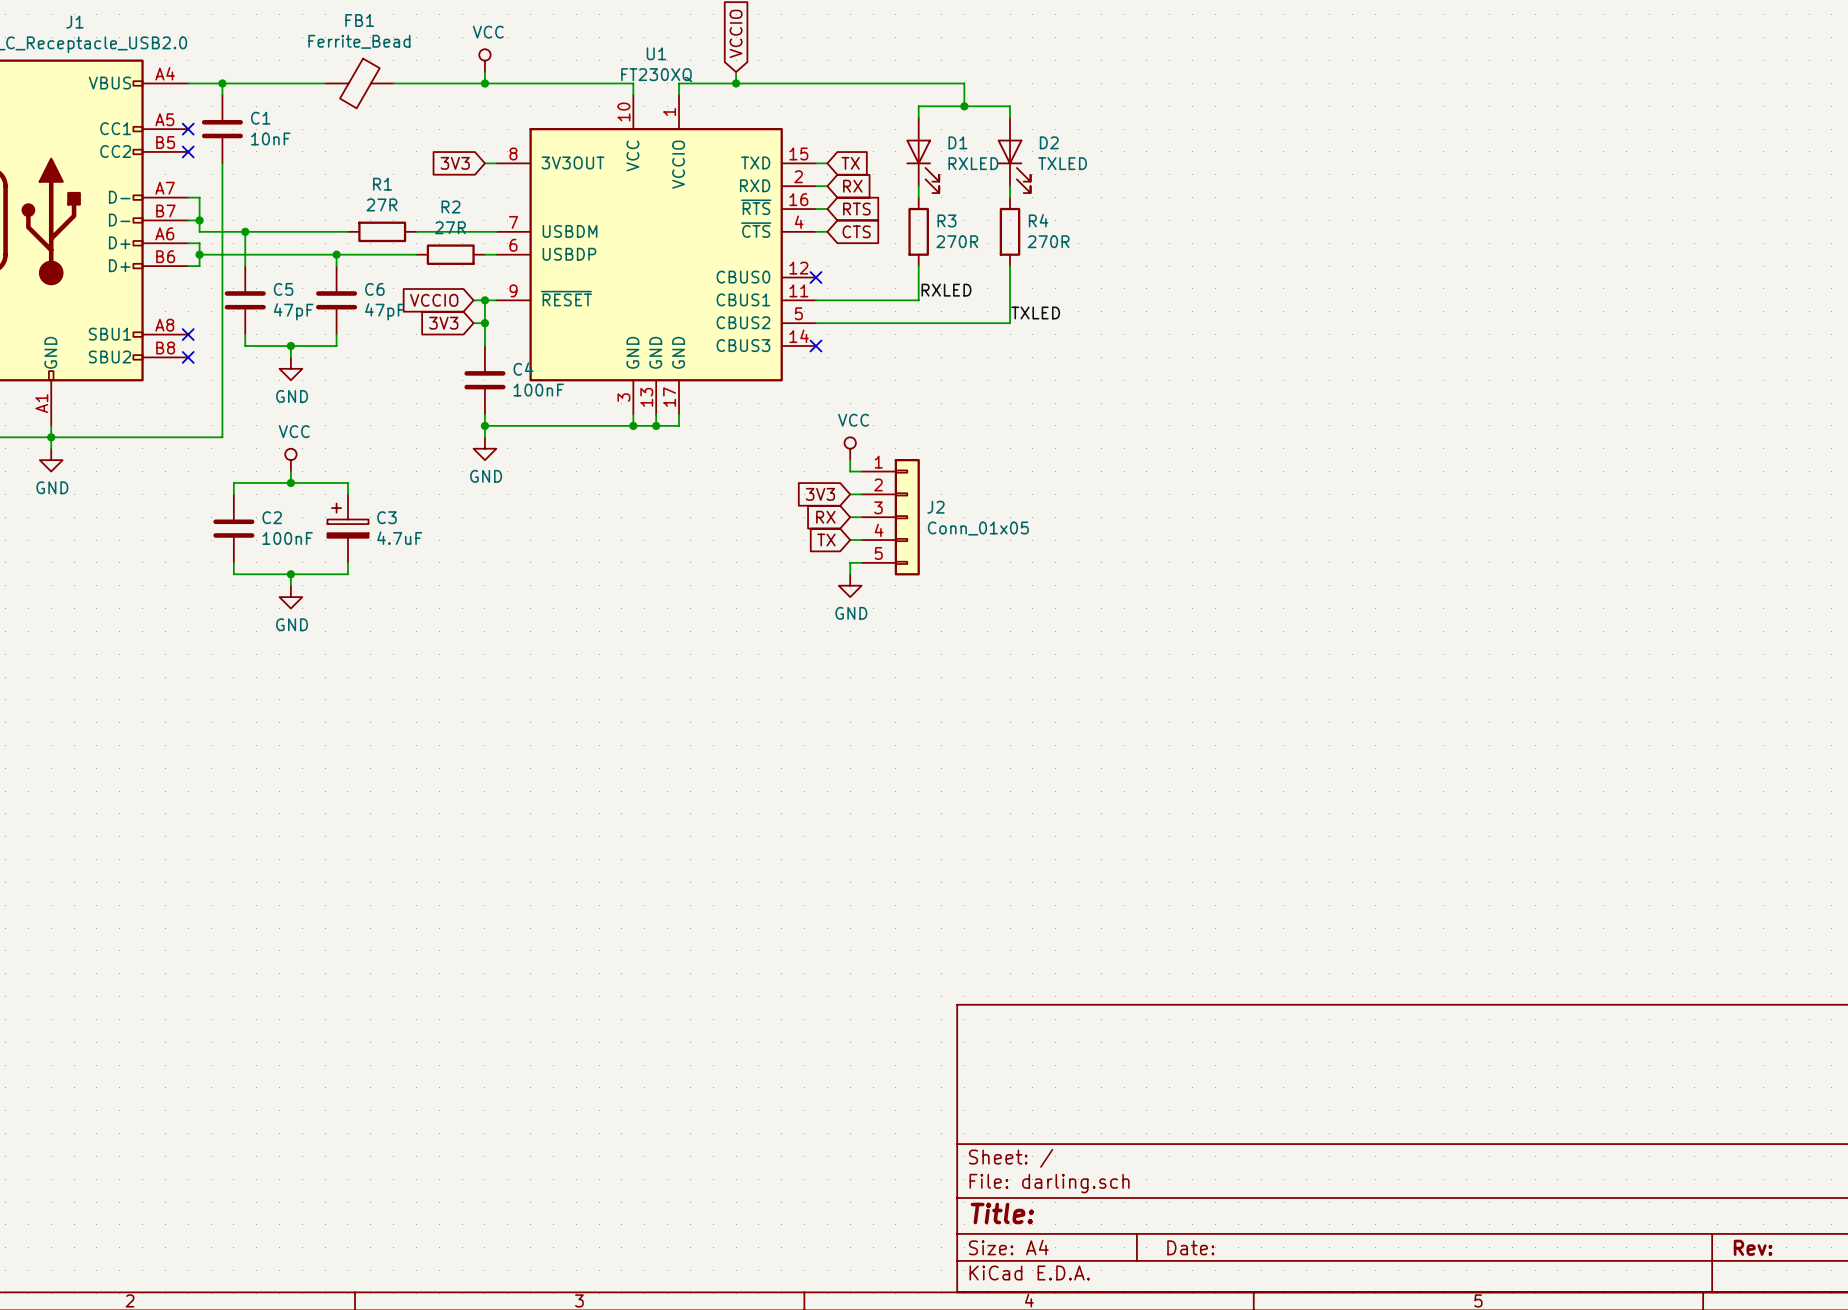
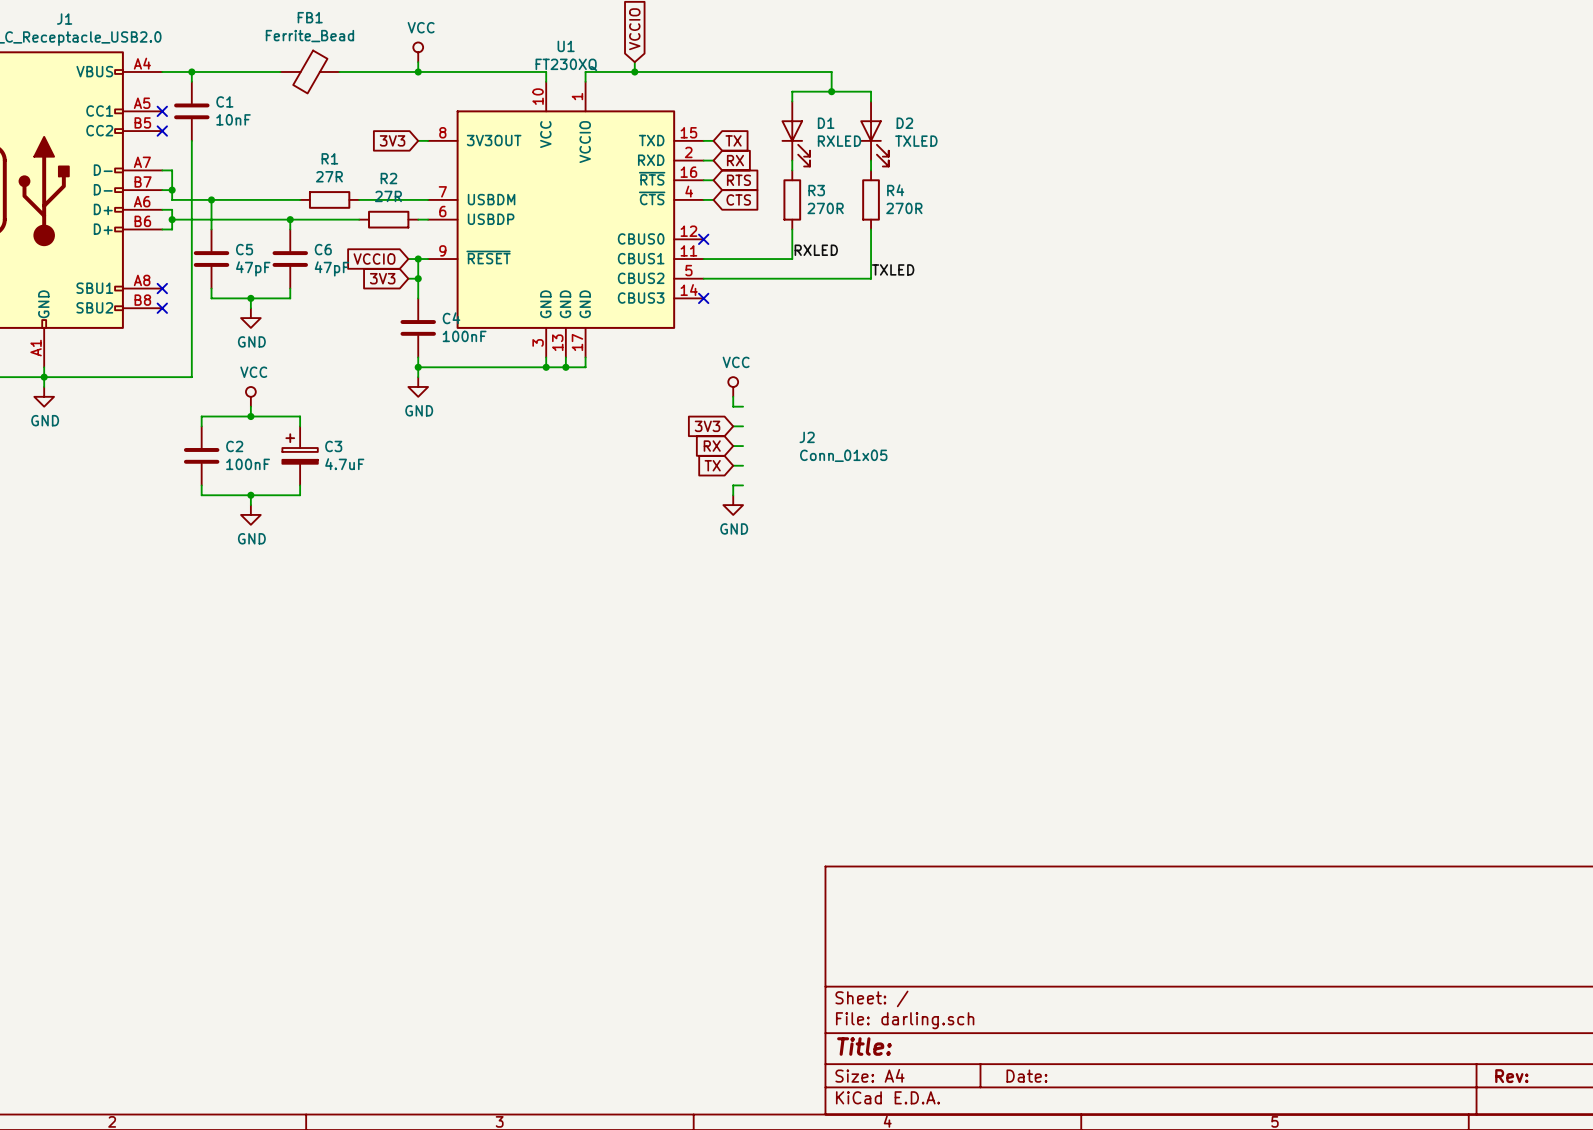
J2 symbol: [861, 459, 920, 576] -> [799, 431, 888, 462]

